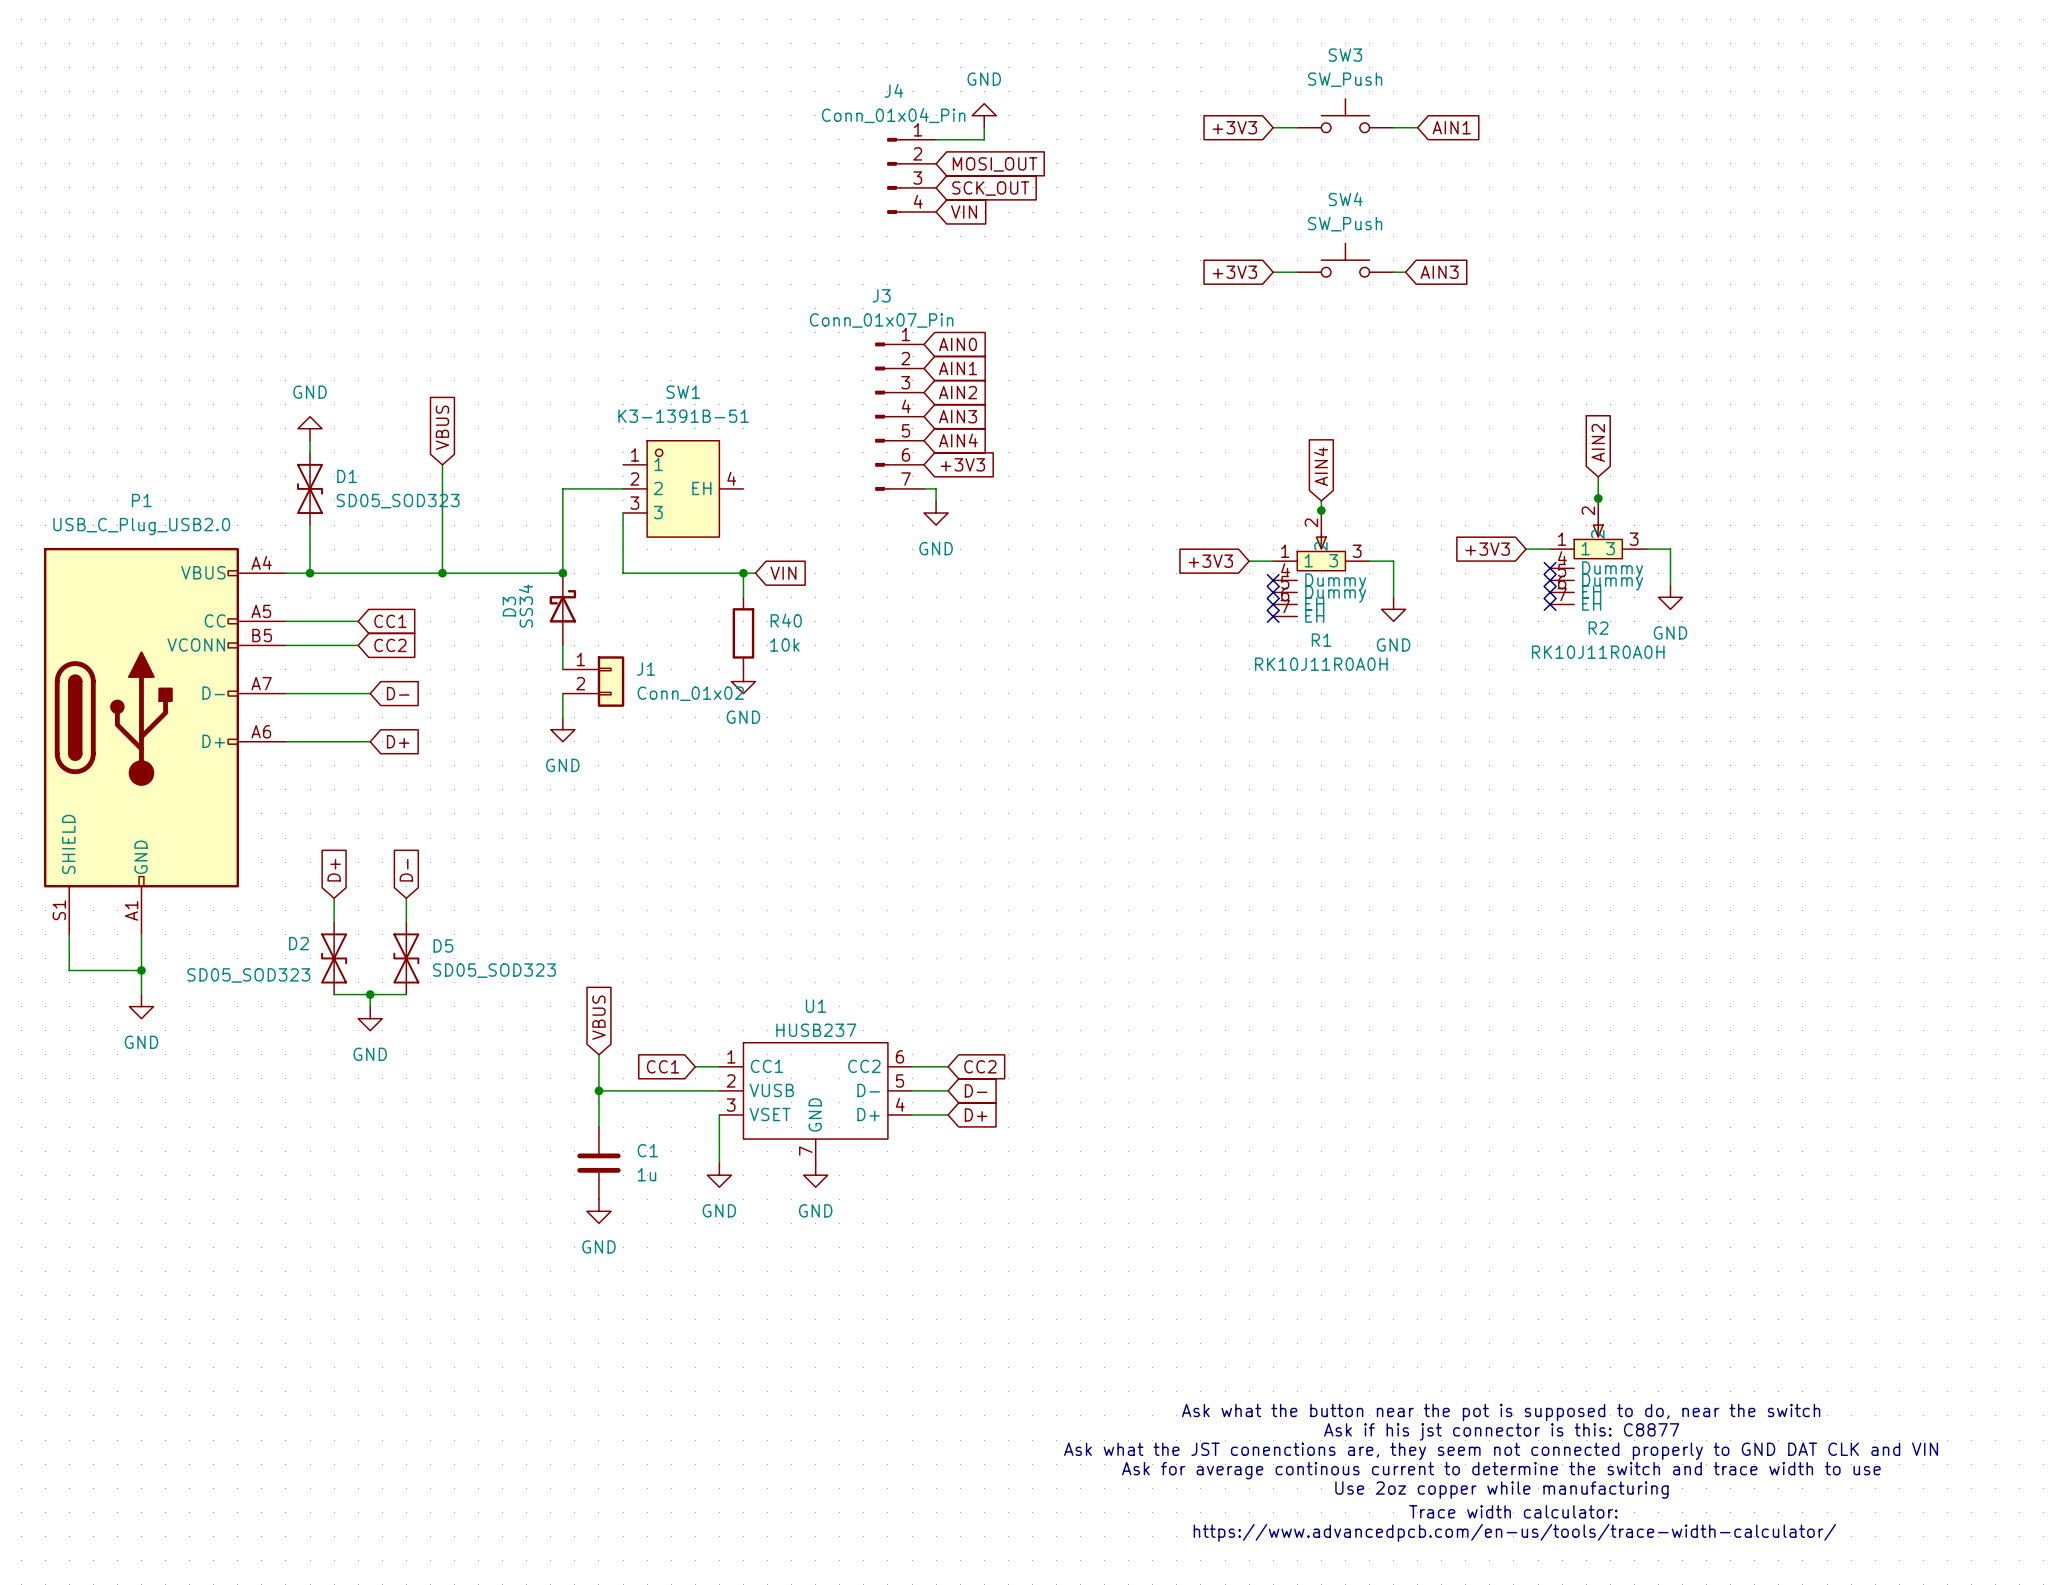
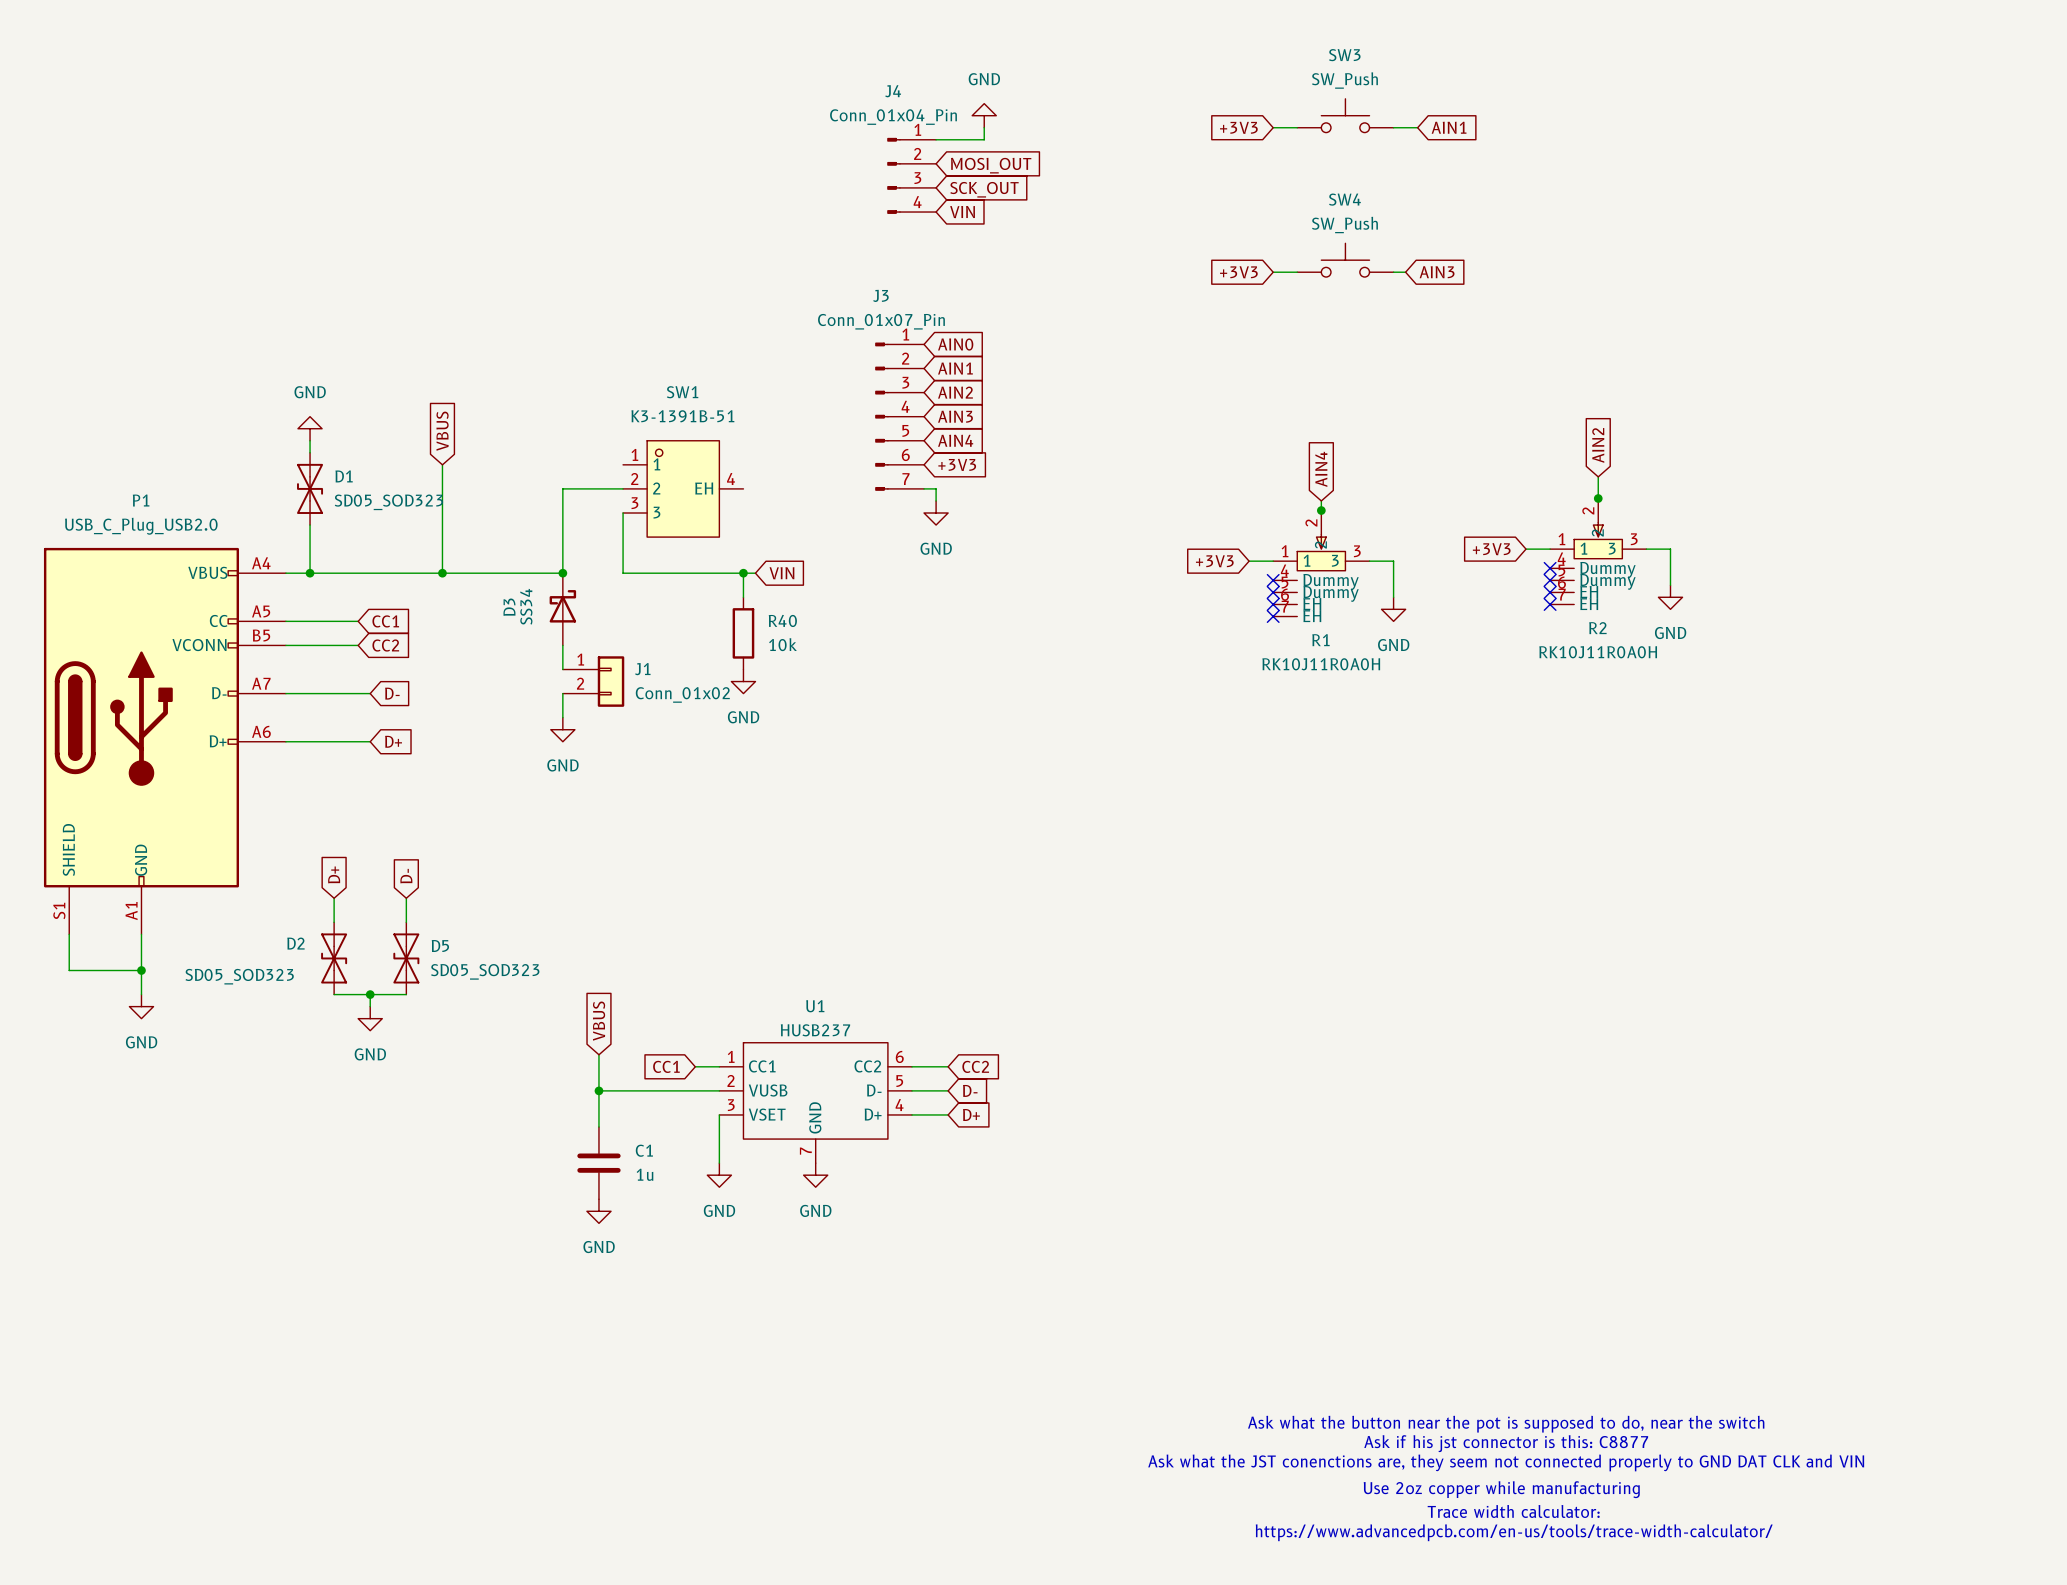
text position: Ask what the button near the pot is supposed to do, near the switch (1501, 1412) -> Ask what the button near the pot is supposed to do, near the switch (1506, 1424)
text position: Ask if his jst connector is this: C8877 (1501, 1431) -> Ask if his jst connector is this: C8877 (1506, 1443)
text position: Ask what the JST conenctions are, they seem not connected properly to GND DAT CLK and VIN (1501, 1451) -> Ask what the JST conenctions are, they seem not connected properly to GND DAT CLK and VIN (1506, 1462)
text: Ask for average continous current to determine the switch and trace width to use (1501, 1470) -> none

